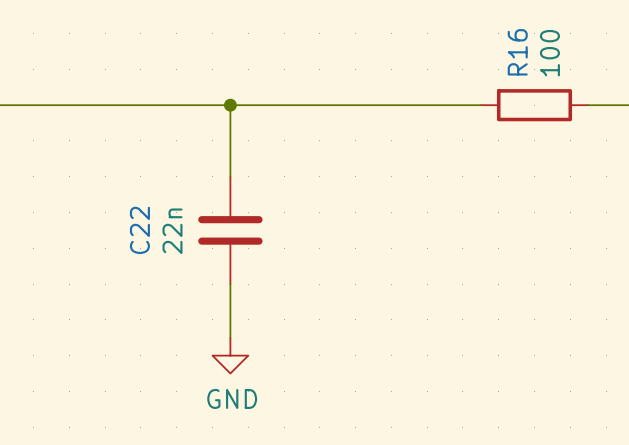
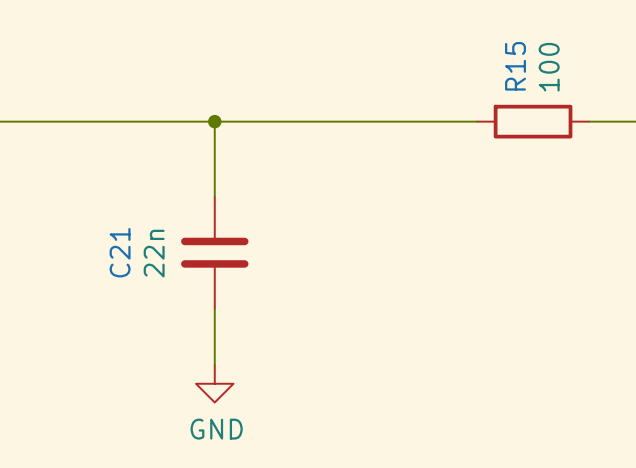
R16 name: R16 (517, 52) -> R15 (515, 66)
C22 name: C22 (139, 230) -> C21 (120, 252)

